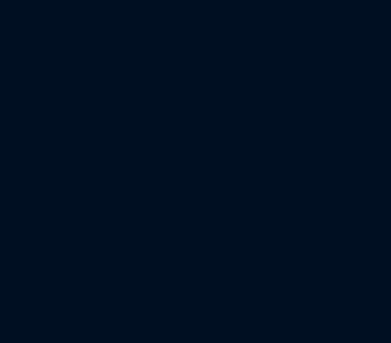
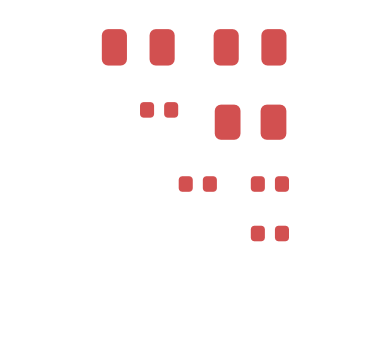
part: none -> (138, 47)
part: none -> (250, 47)
part: none -> (159, 109)
part: none -> (250, 122)
part: none -> (197, 184)
part: none -> (269, 184)
part: none -> (269, 233)

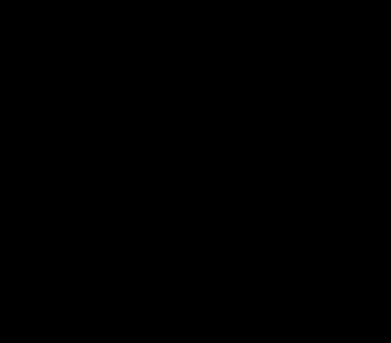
part: (138, 47) -> none
part: (250, 47) -> none
part: (159, 109) -> none
part: (250, 122) -> none
part: (197, 184) -> none
part: (269, 184) -> none
part: (269, 233) -> none

